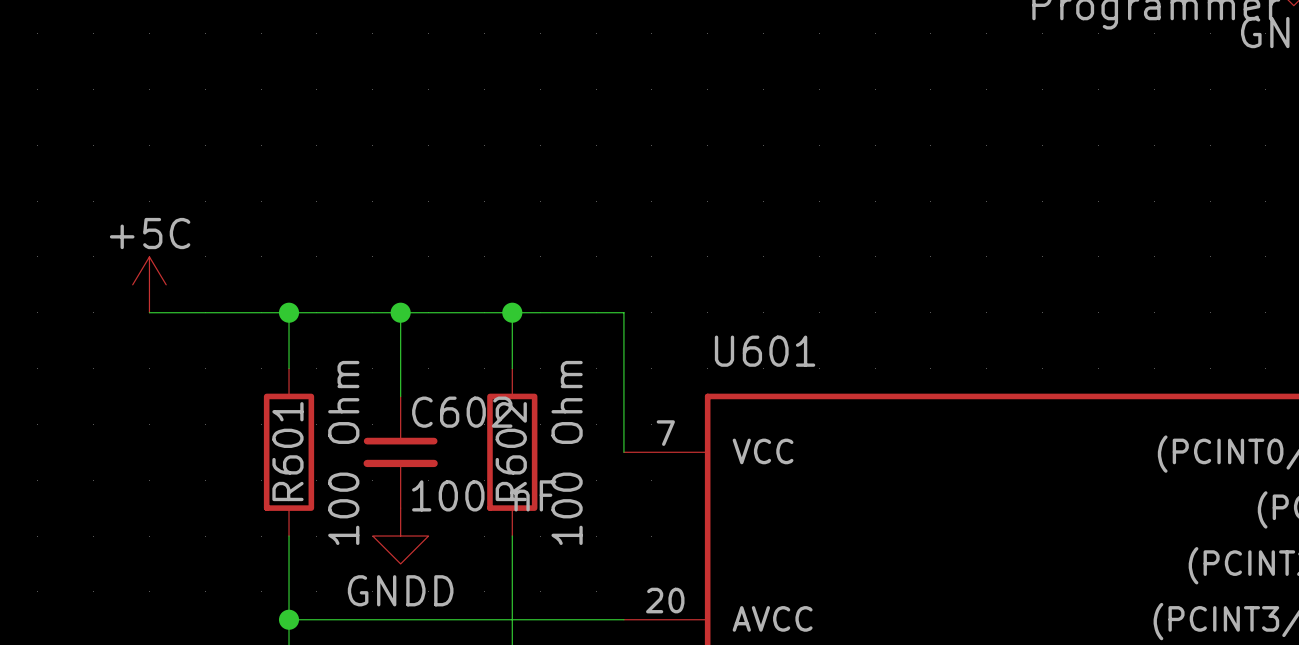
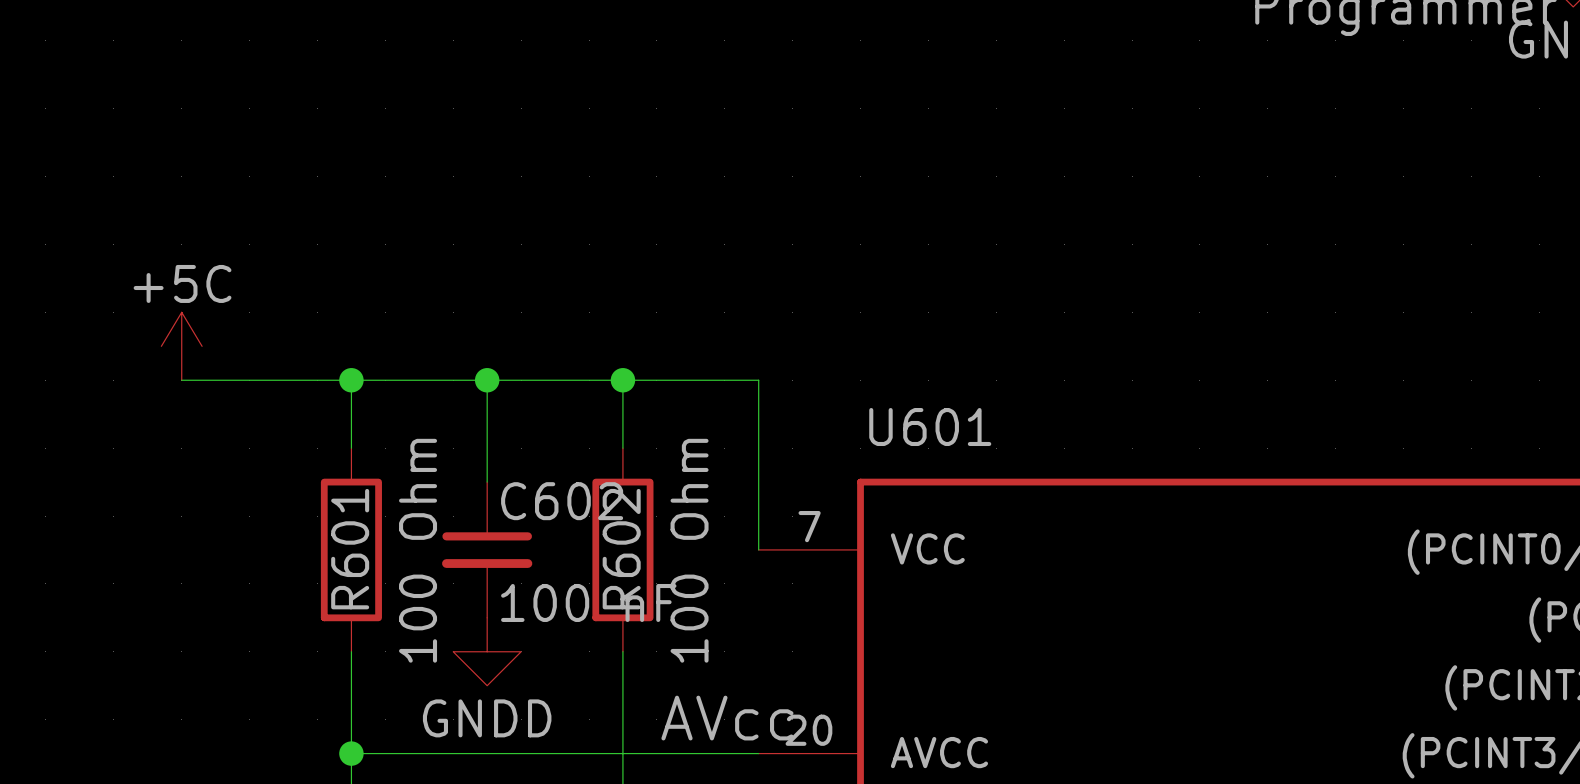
label: none -> AVcc (727, 718)

